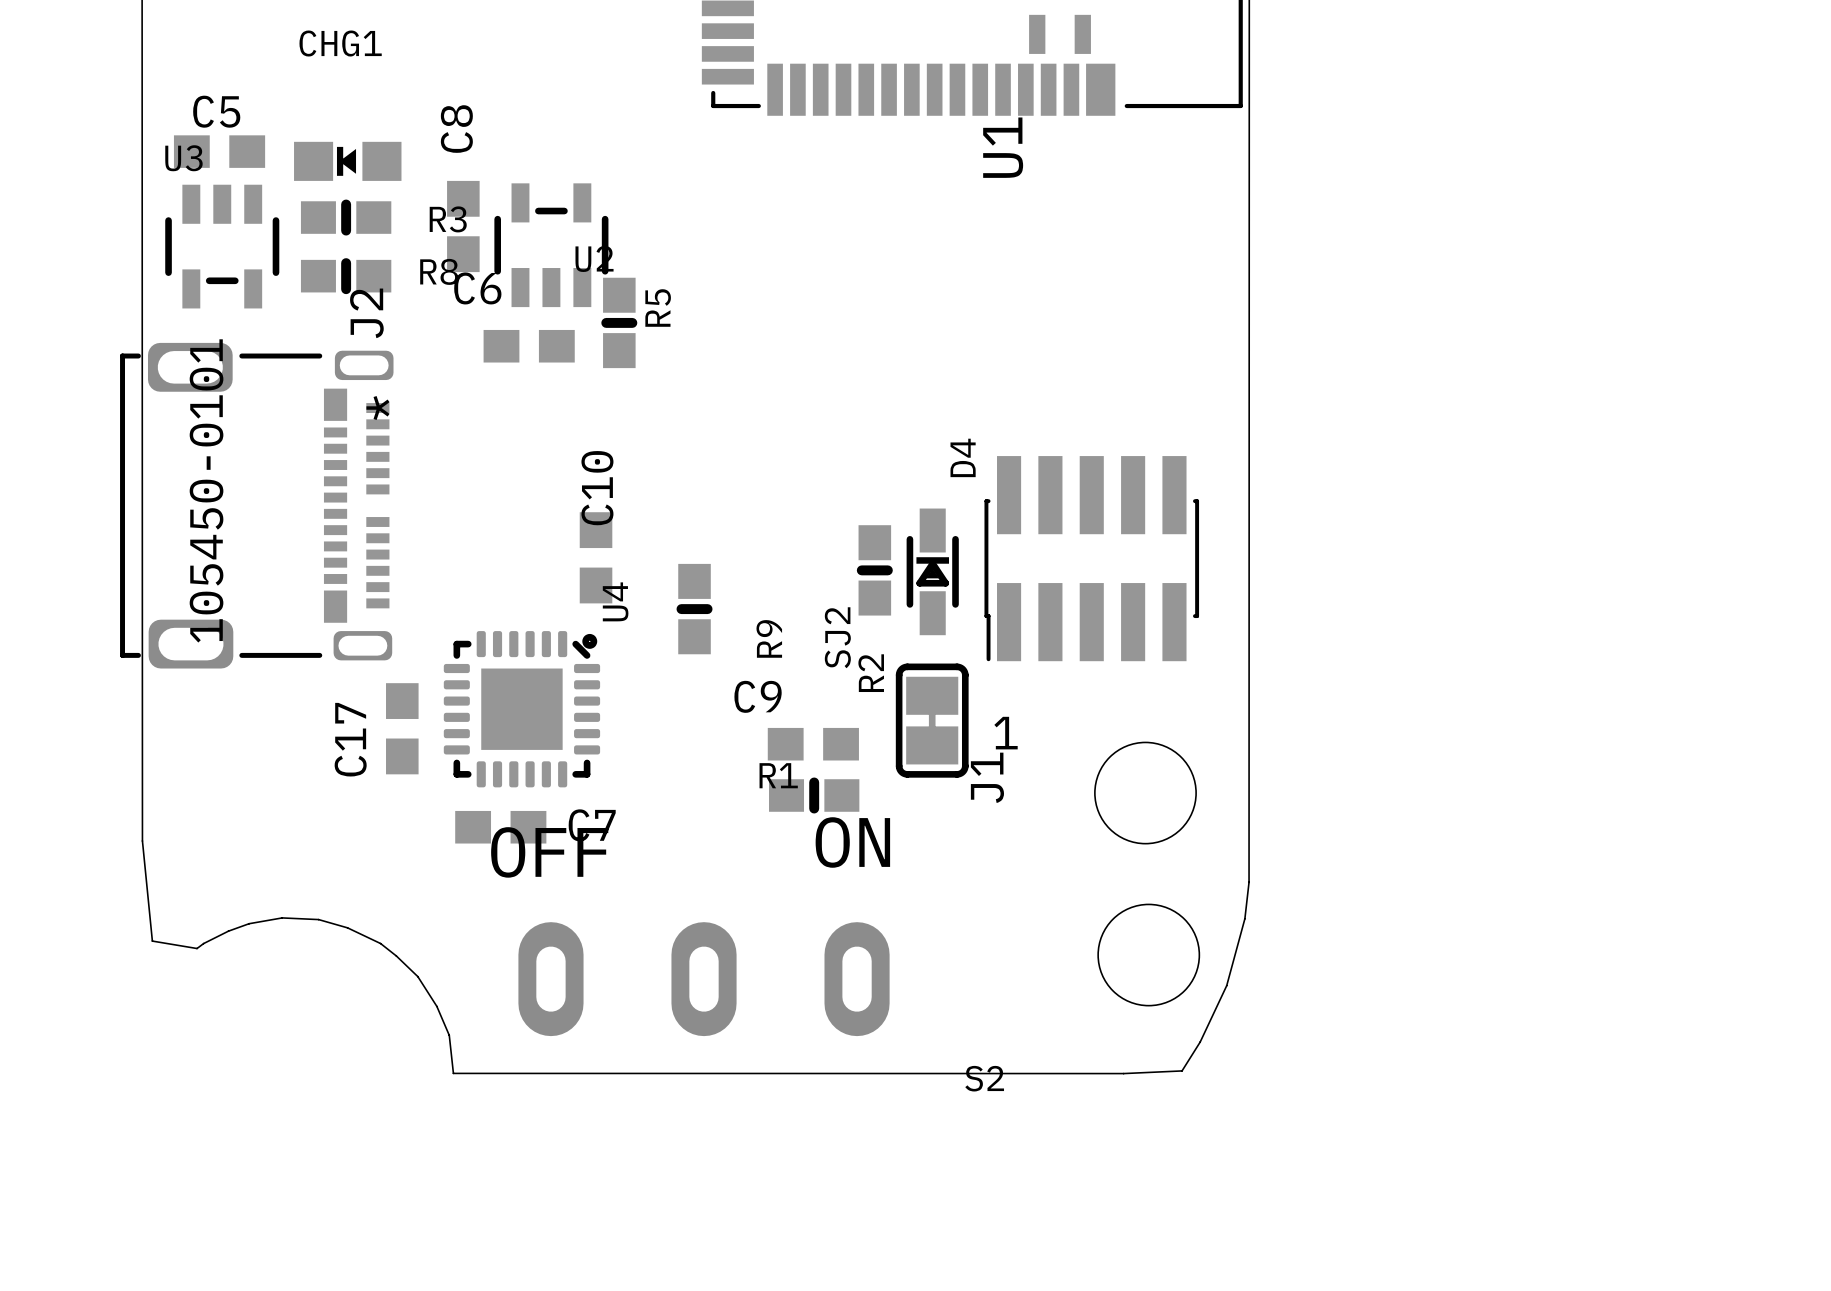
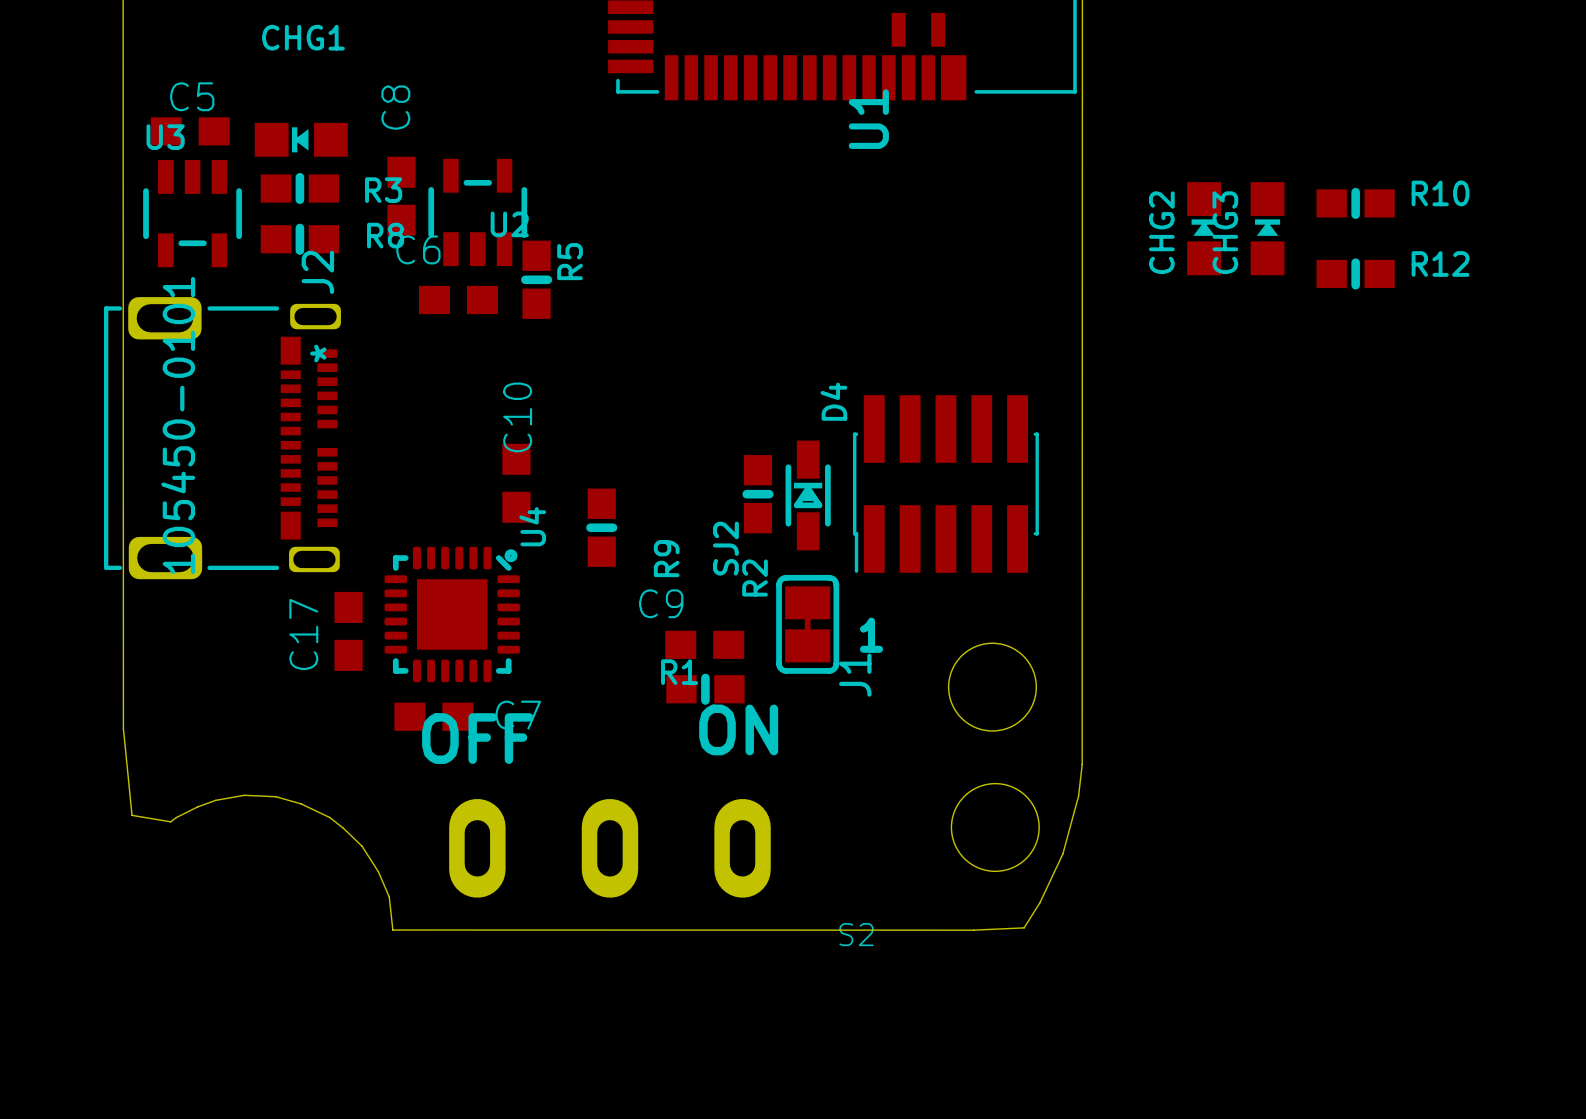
R10: none -> (1355, 203)
CHG2: none -> (1204, 228)
CHG3: none -> (1267, 228)
R12: none -> (1355, 273)

